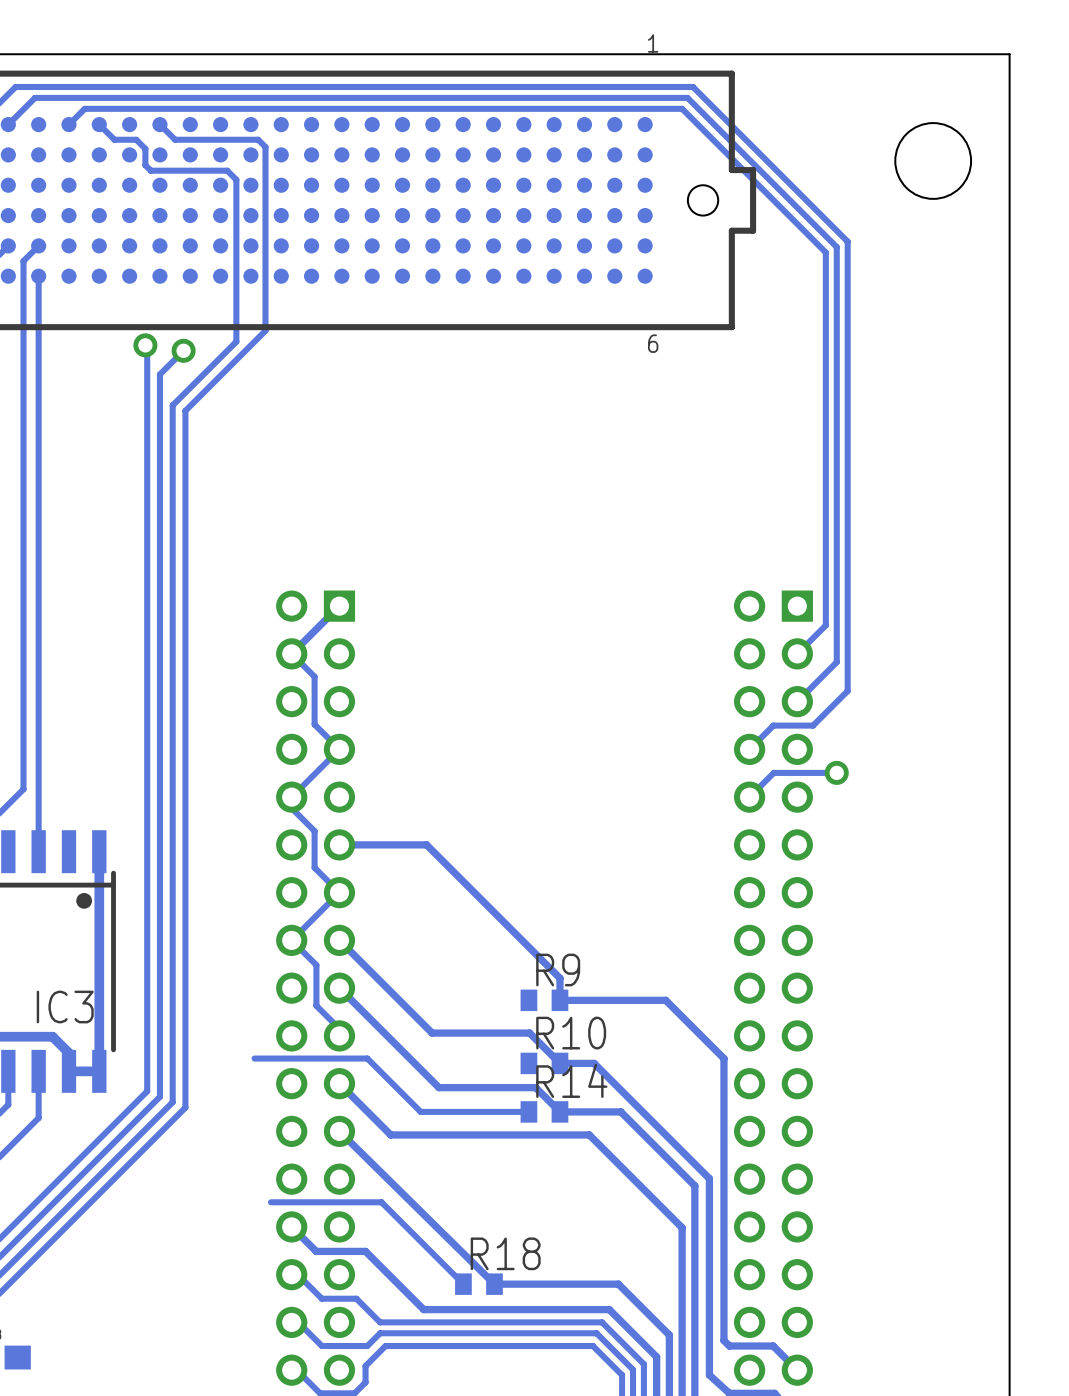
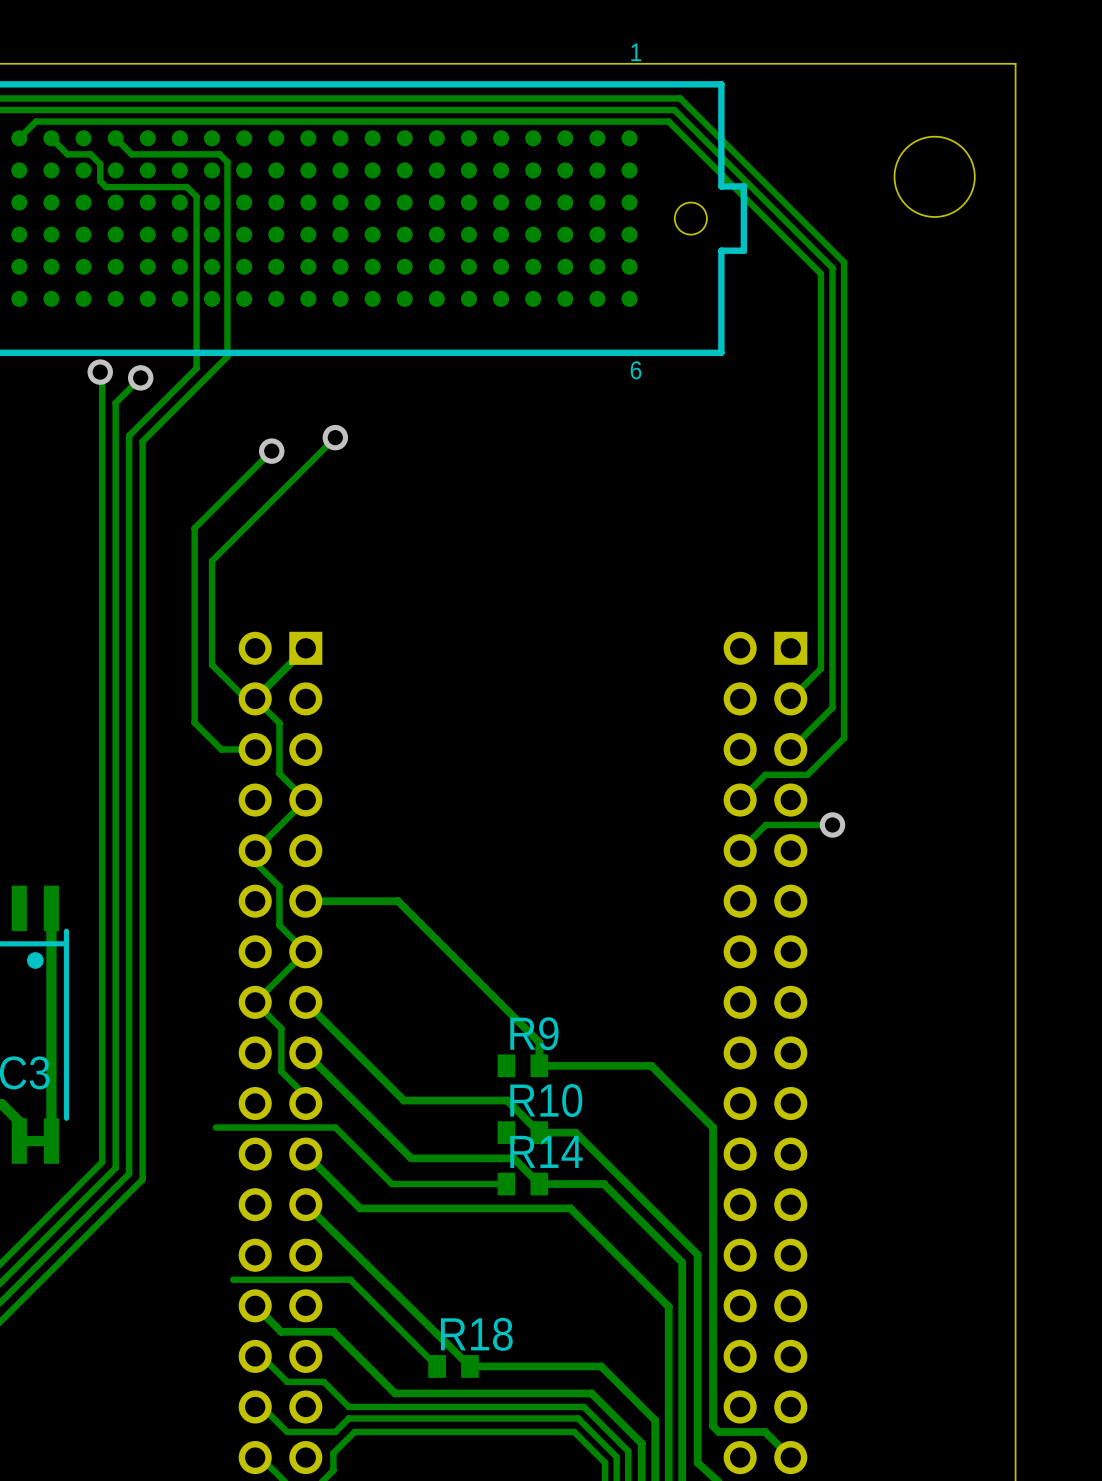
track: none -> (335, 437) (212, 560) (212, 665) (245, 698) (255, 698)
via: none -> (335, 437)
track: none -> (271, 451) (194, 528) (194, 722) (221, 749) (255, 749)
via: none -> (271, 451)

